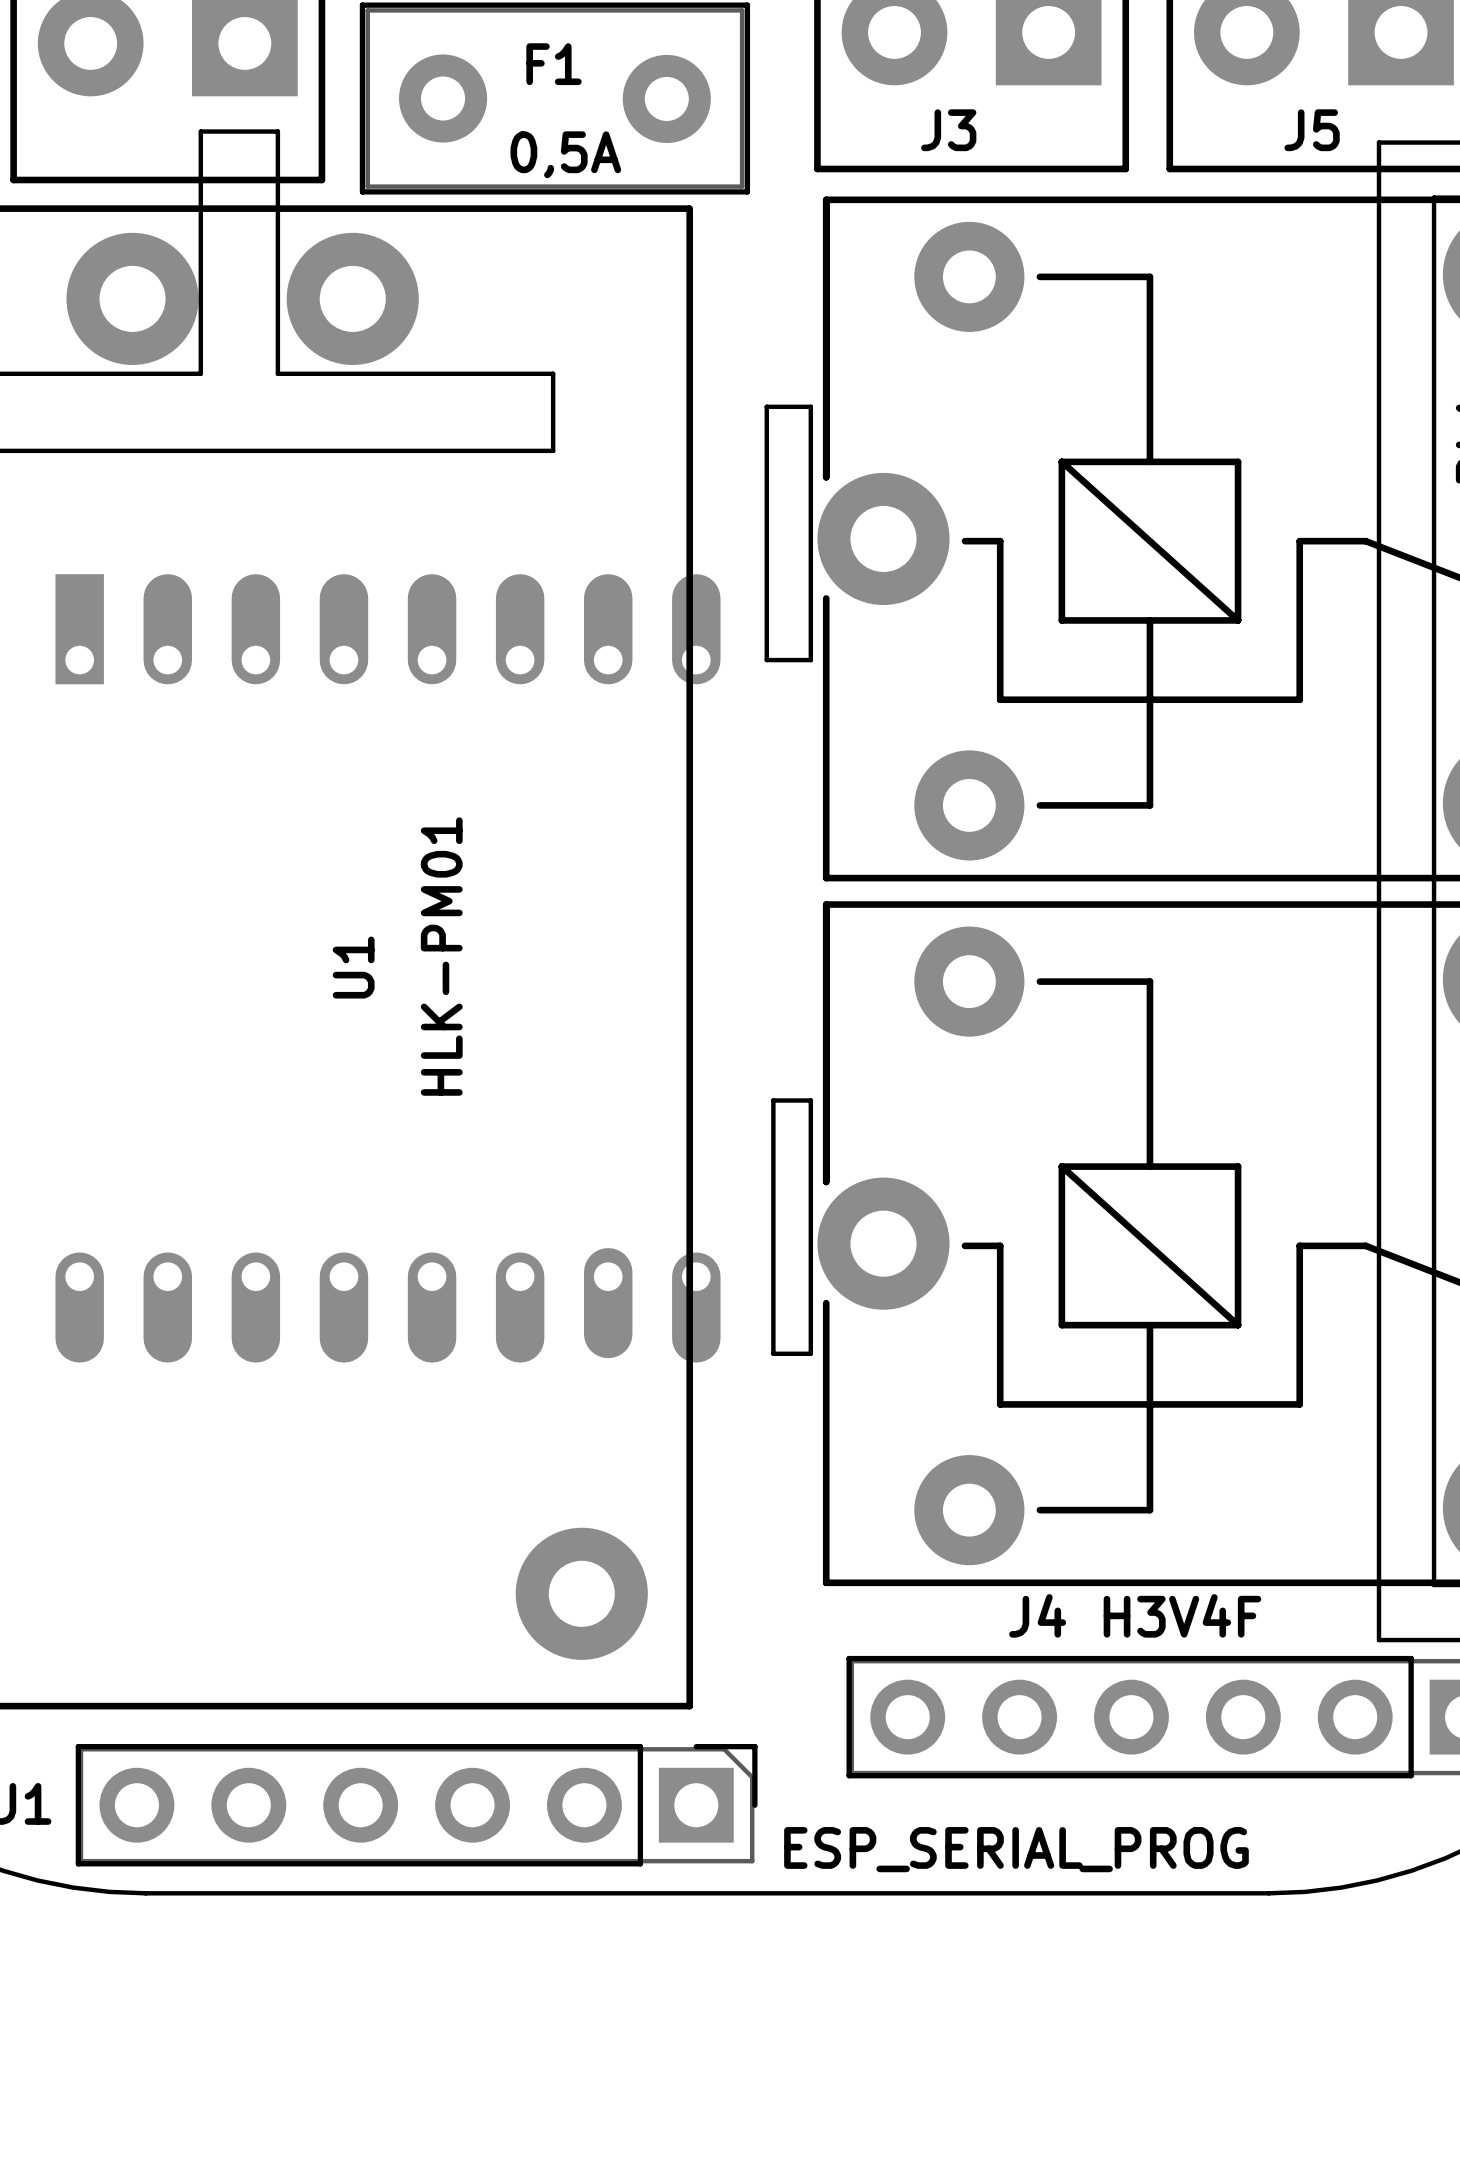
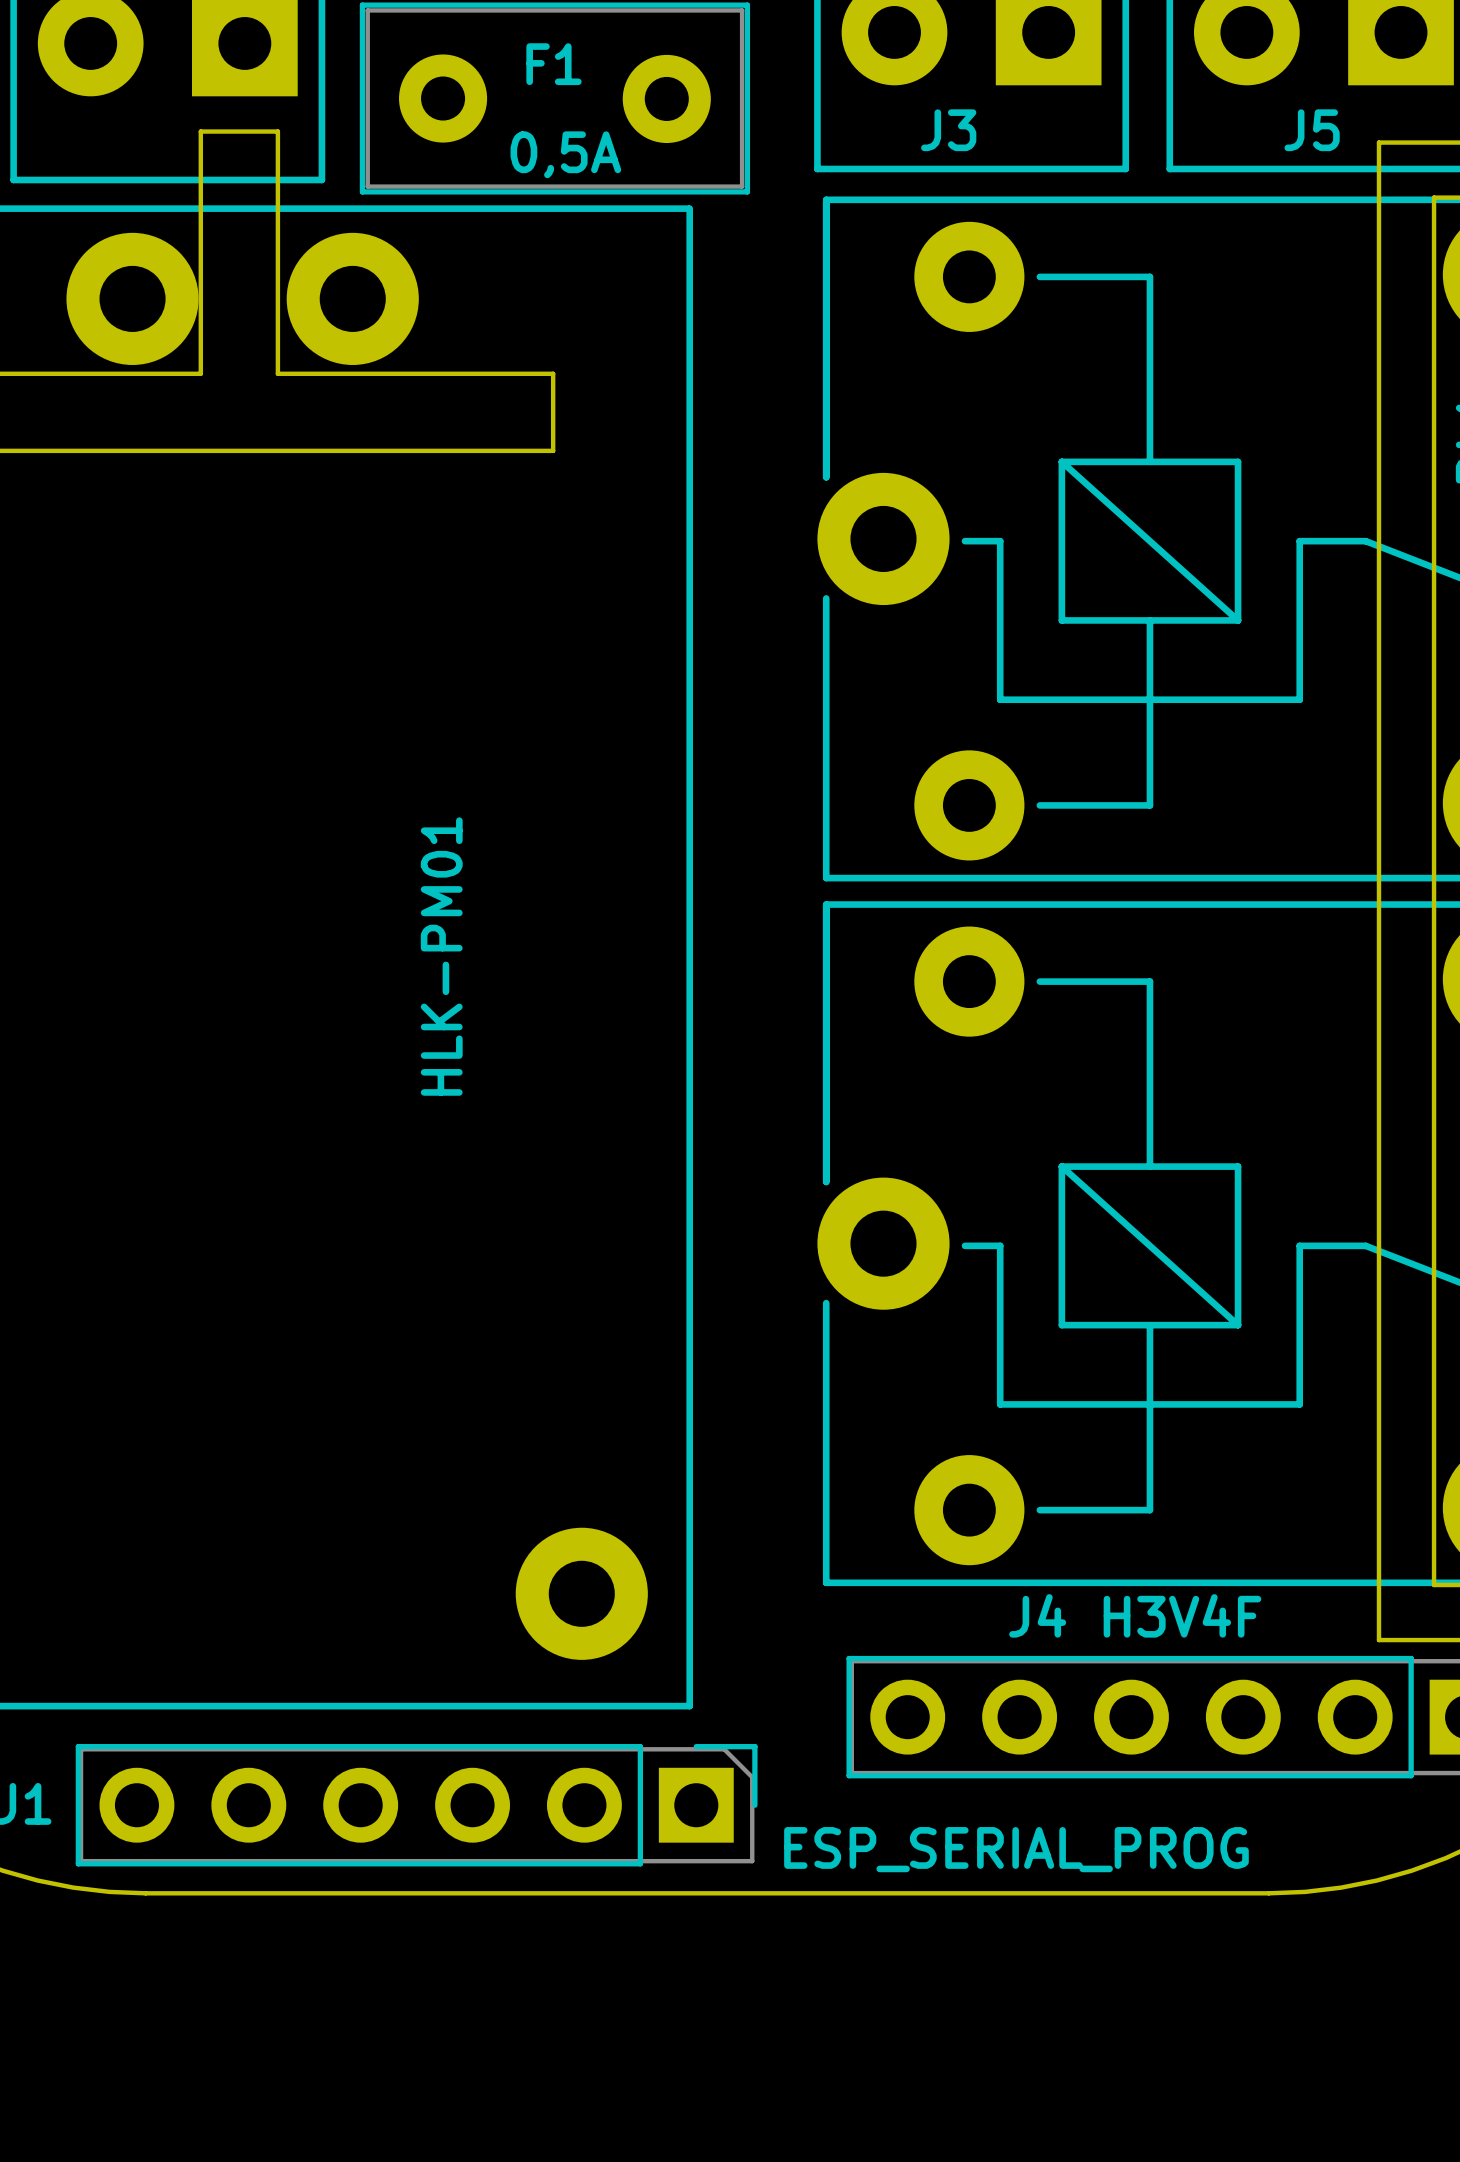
board edge: (766, 406) (810, 406) (810, 660) (766, 660) (766, 406) -> none
U1: (387, 968) -> none
board edge: (773, 1100) (810, 1100) (810, 1353) (773, 1353) (773, 1100) -> none

